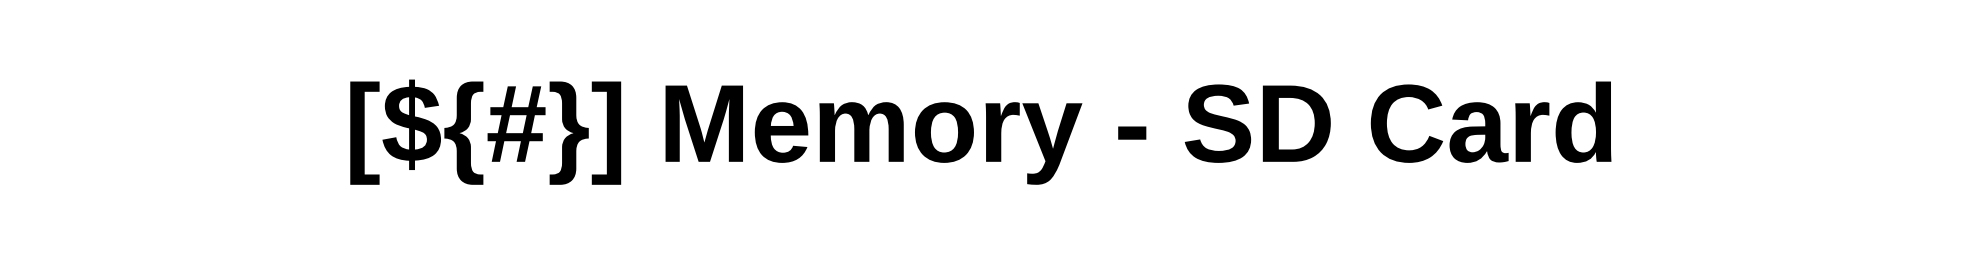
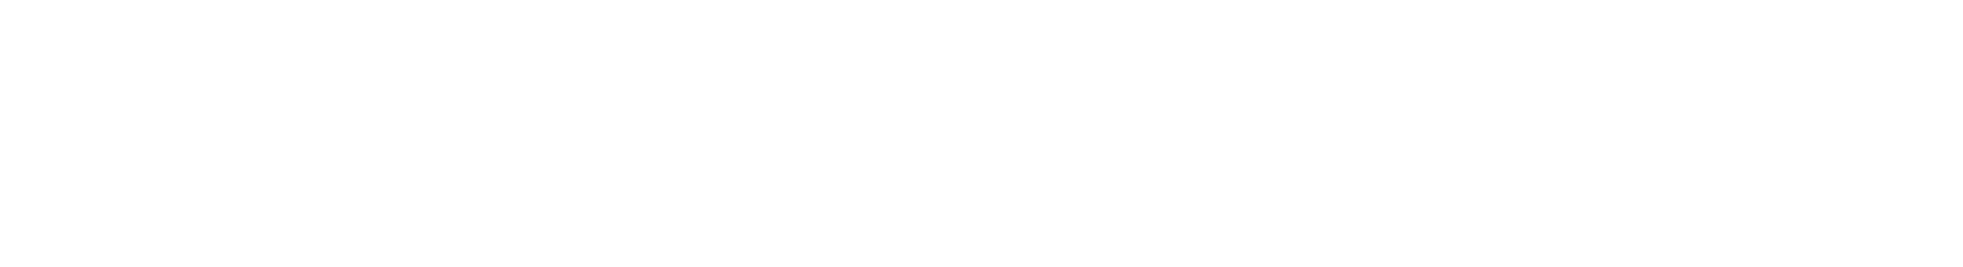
text: [${#}] Memory - SD Card (980, 132) -> none

